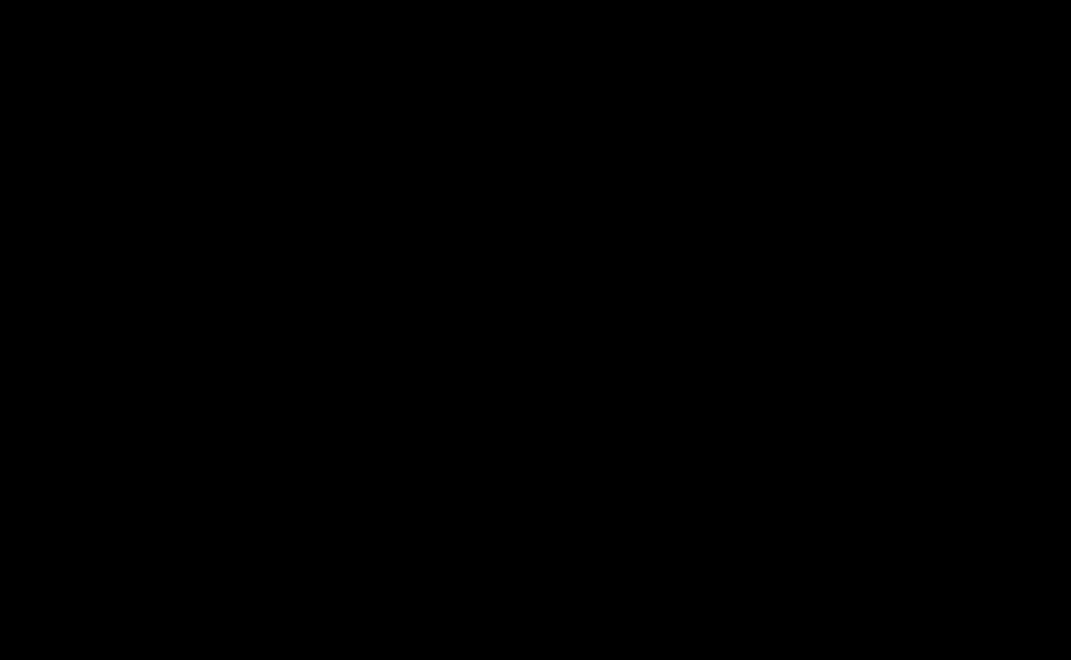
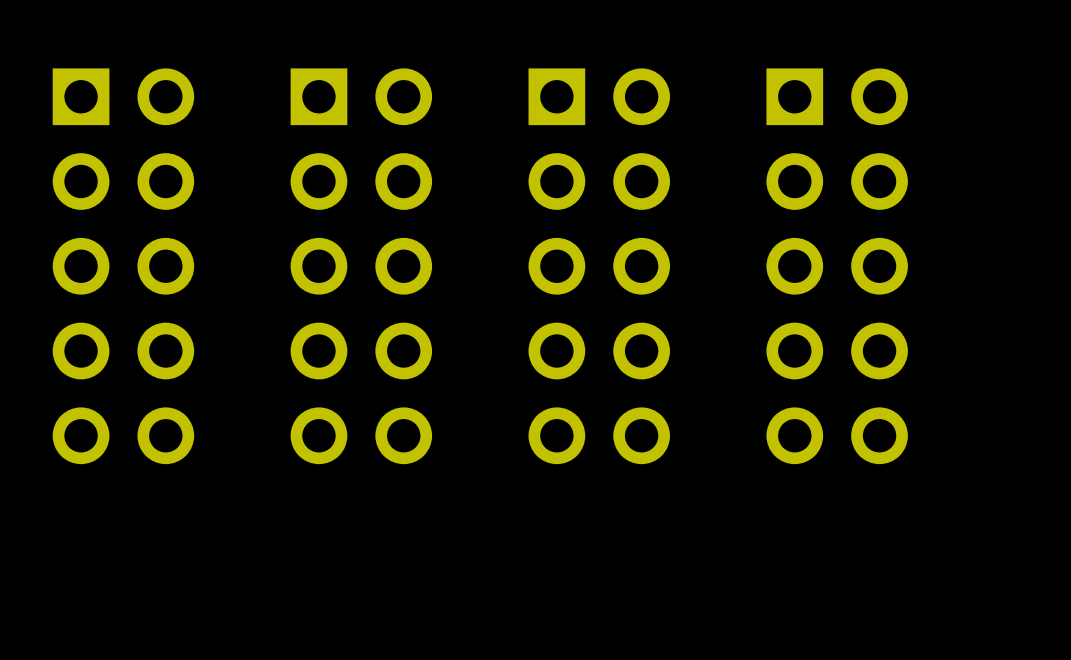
part: none -> (123, 266)
part: none -> (361, 266)
part: none -> (599, 266)
part: none -> (837, 266)

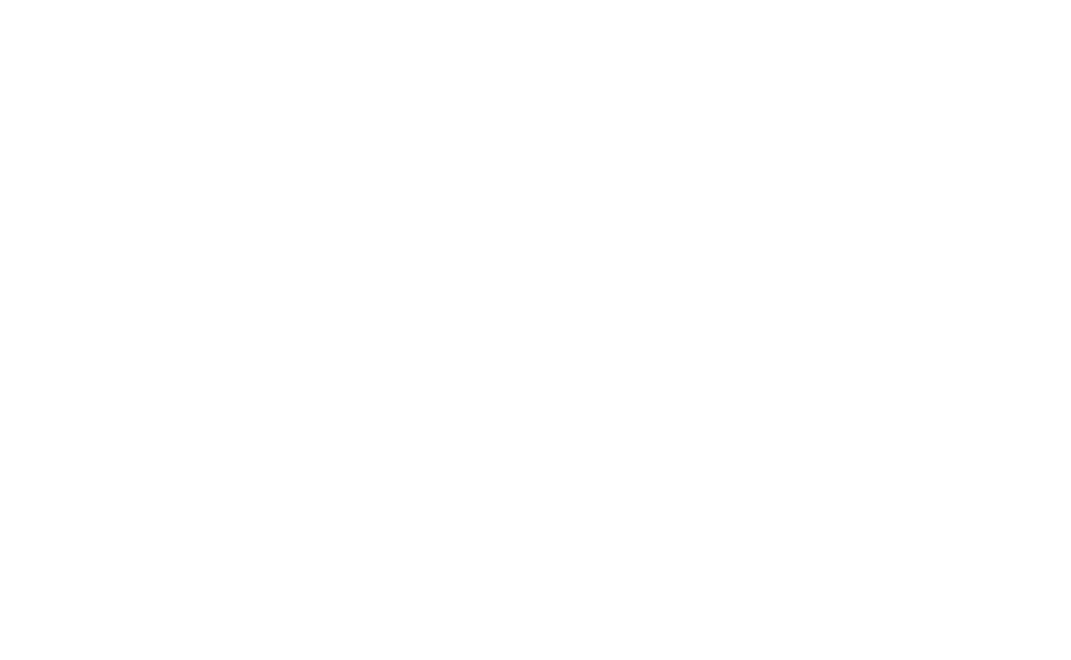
part: (123, 266) -> none
part: (361, 266) -> none
part: (599, 266) -> none
part: (837, 266) -> none

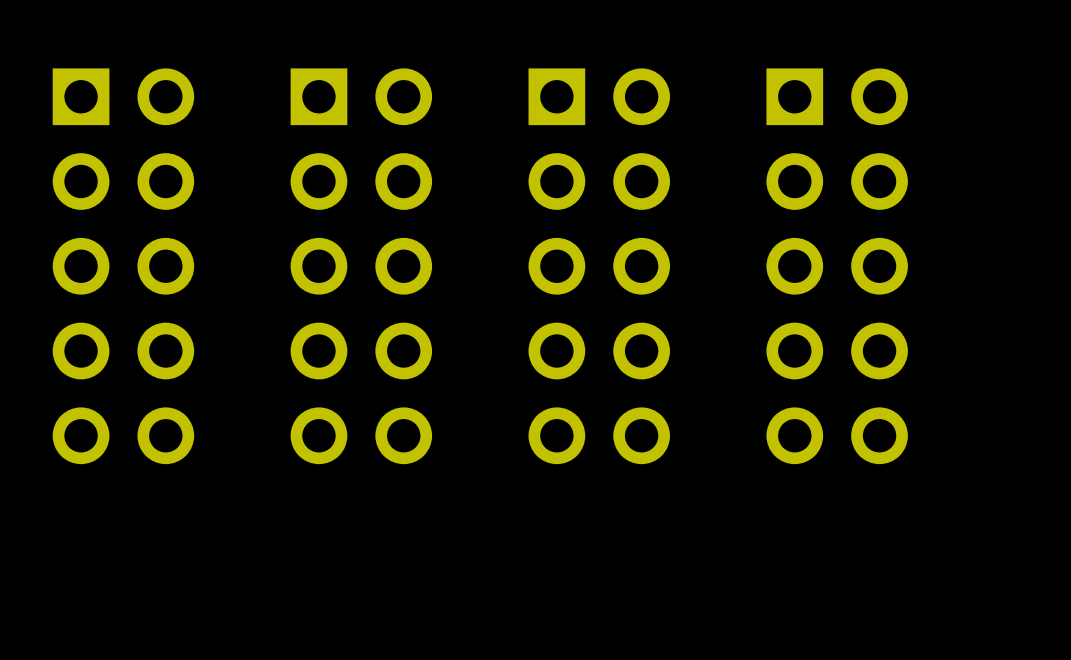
part: none -> (123, 266)
part: none -> (361, 266)
part: none -> (599, 266)
part: none -> (837, 266)

